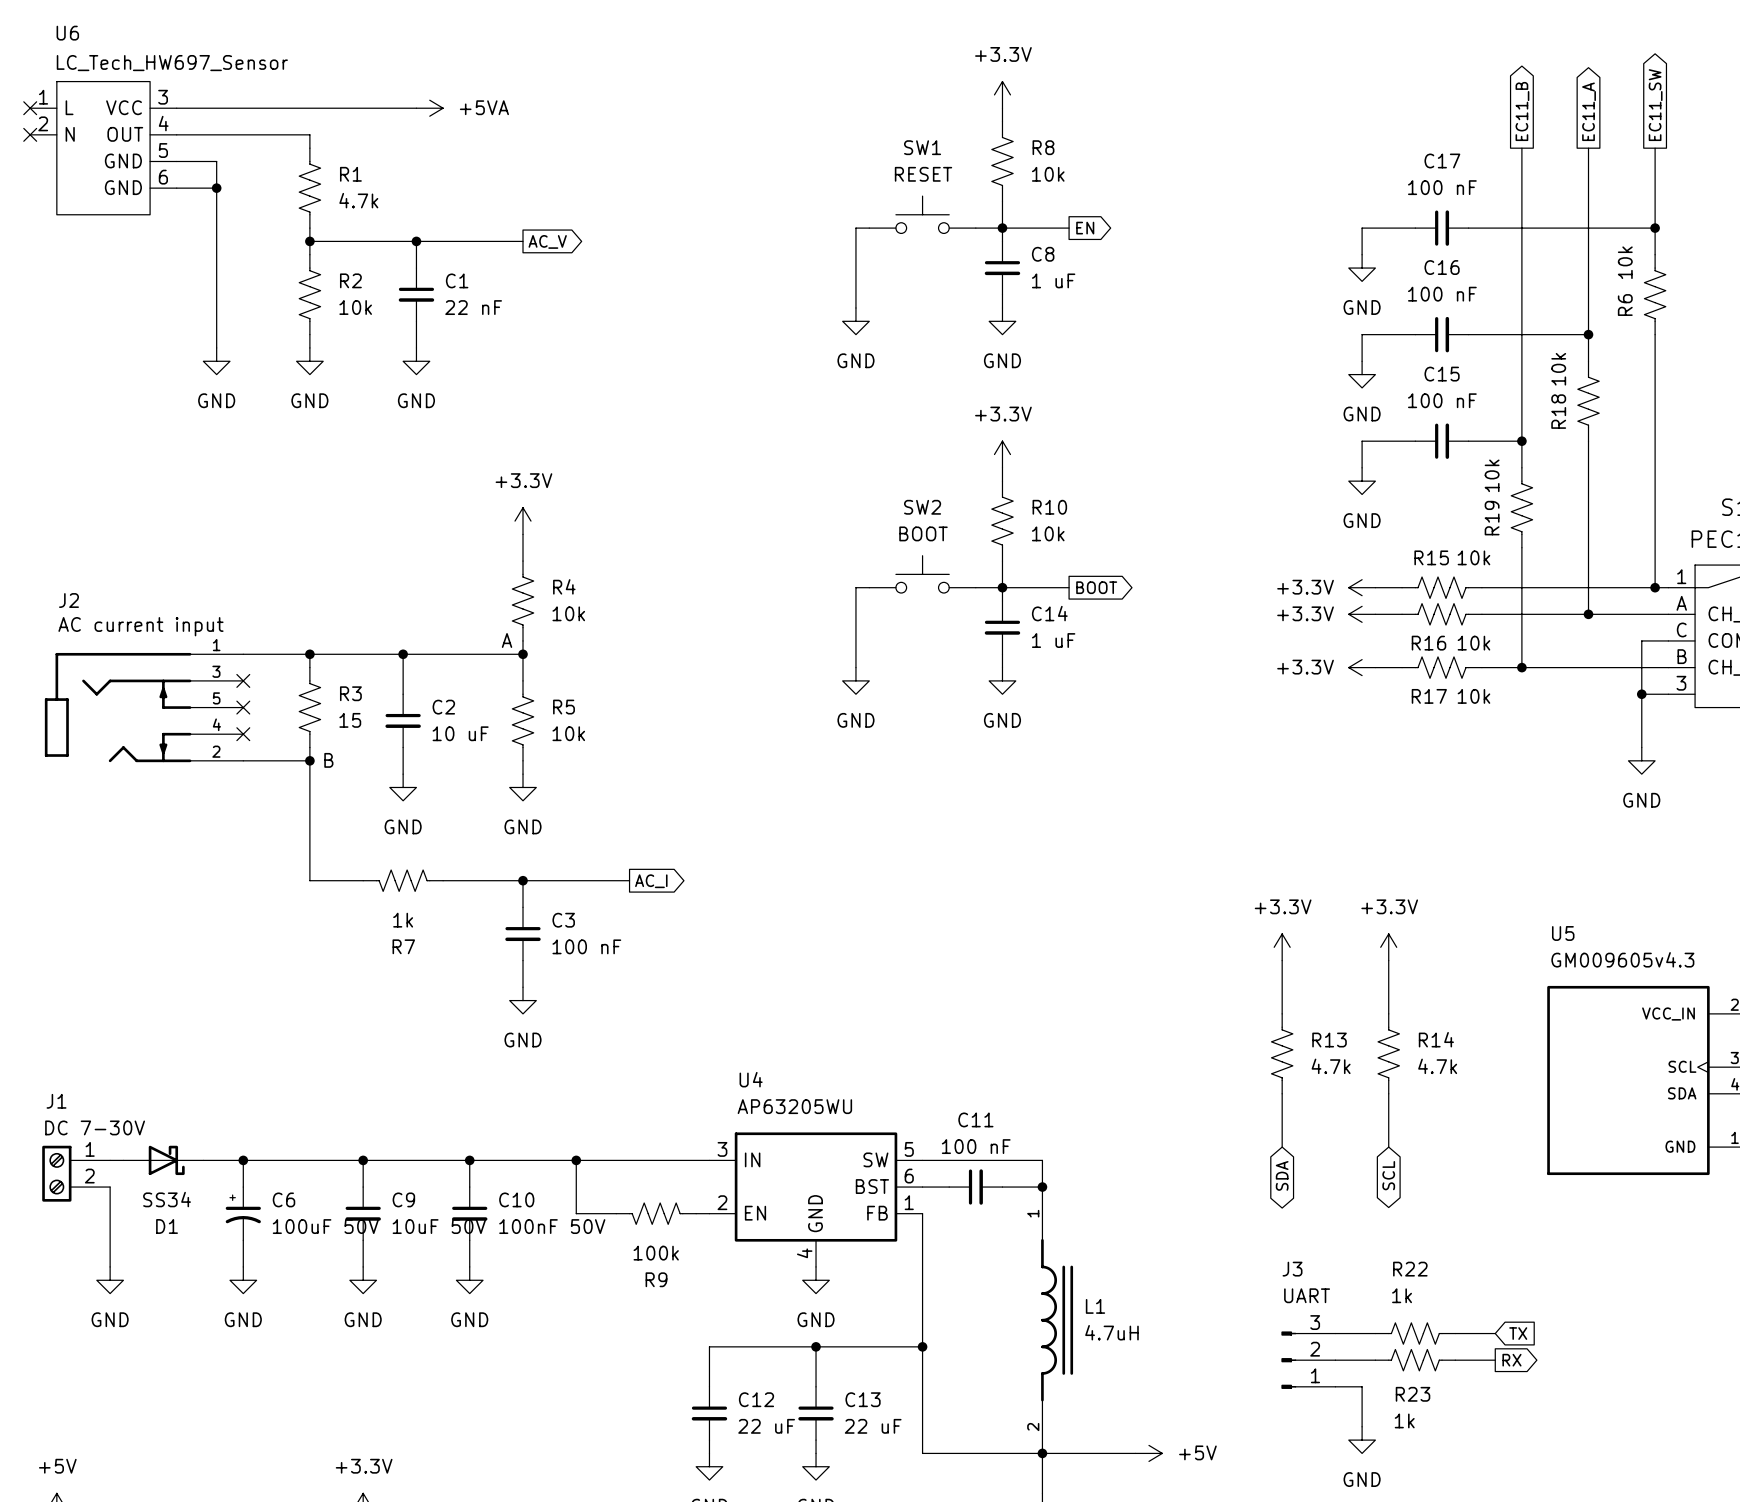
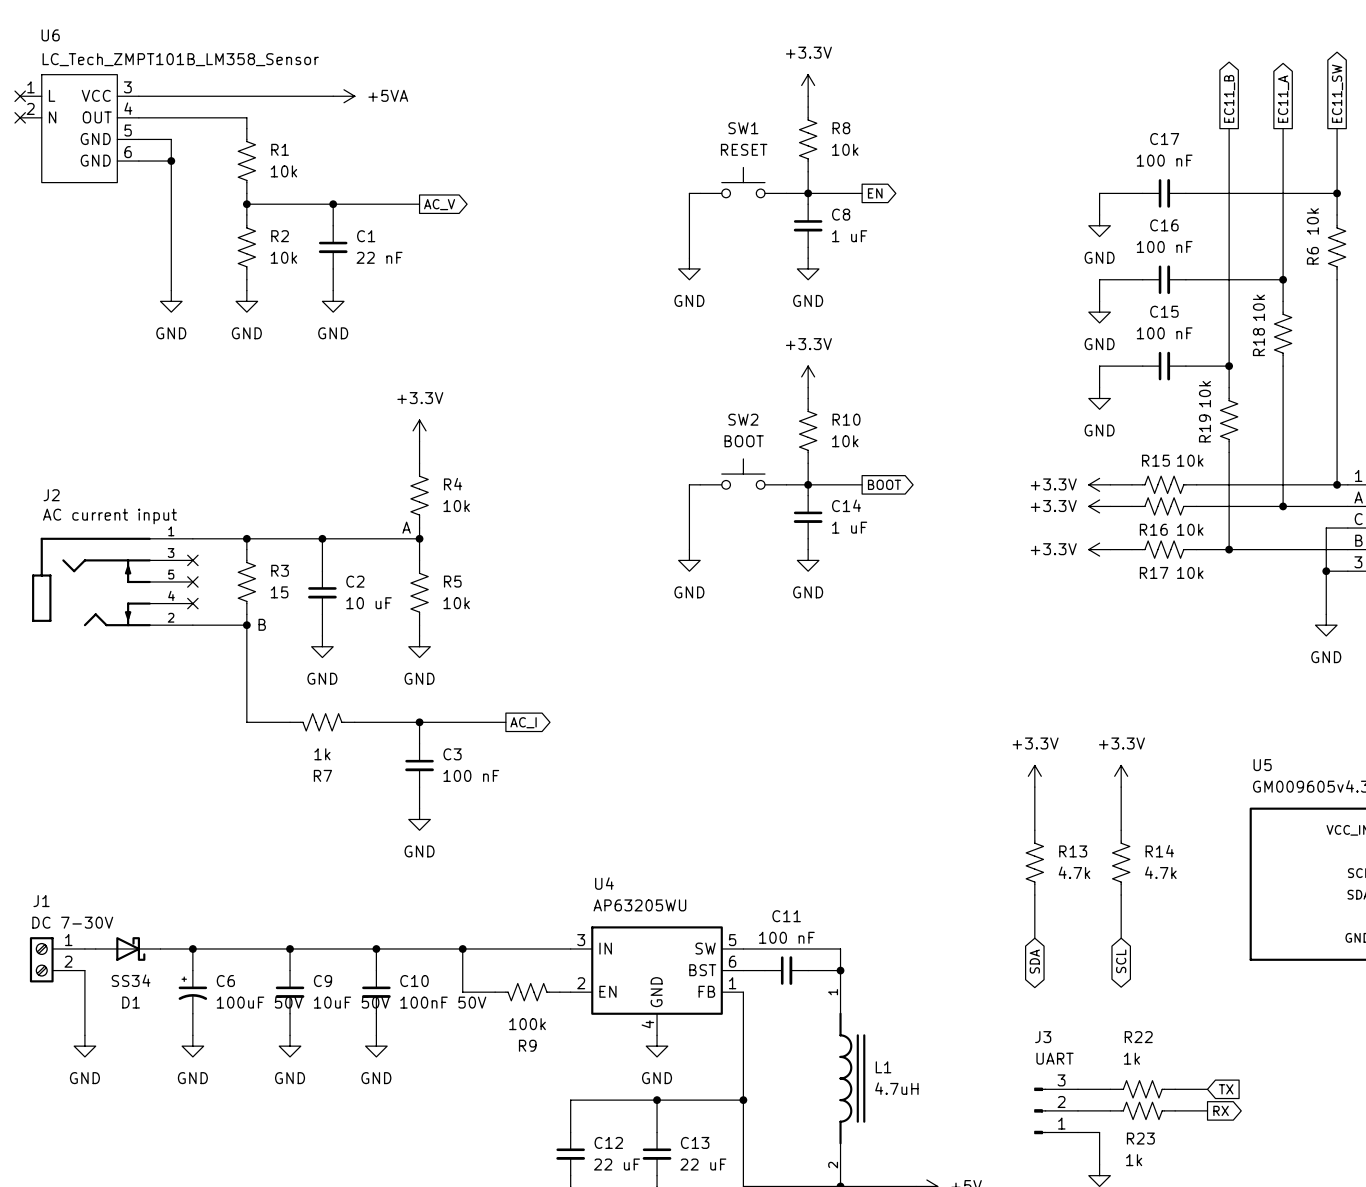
U6 value: LC_Tech_HW697_Sensor (172, 63) -> LC_Tech_ZMPT101B_LM358_Sensor (180, 59)
R1 value: 4.7k (358, 200) -> 10k (283, 171)

